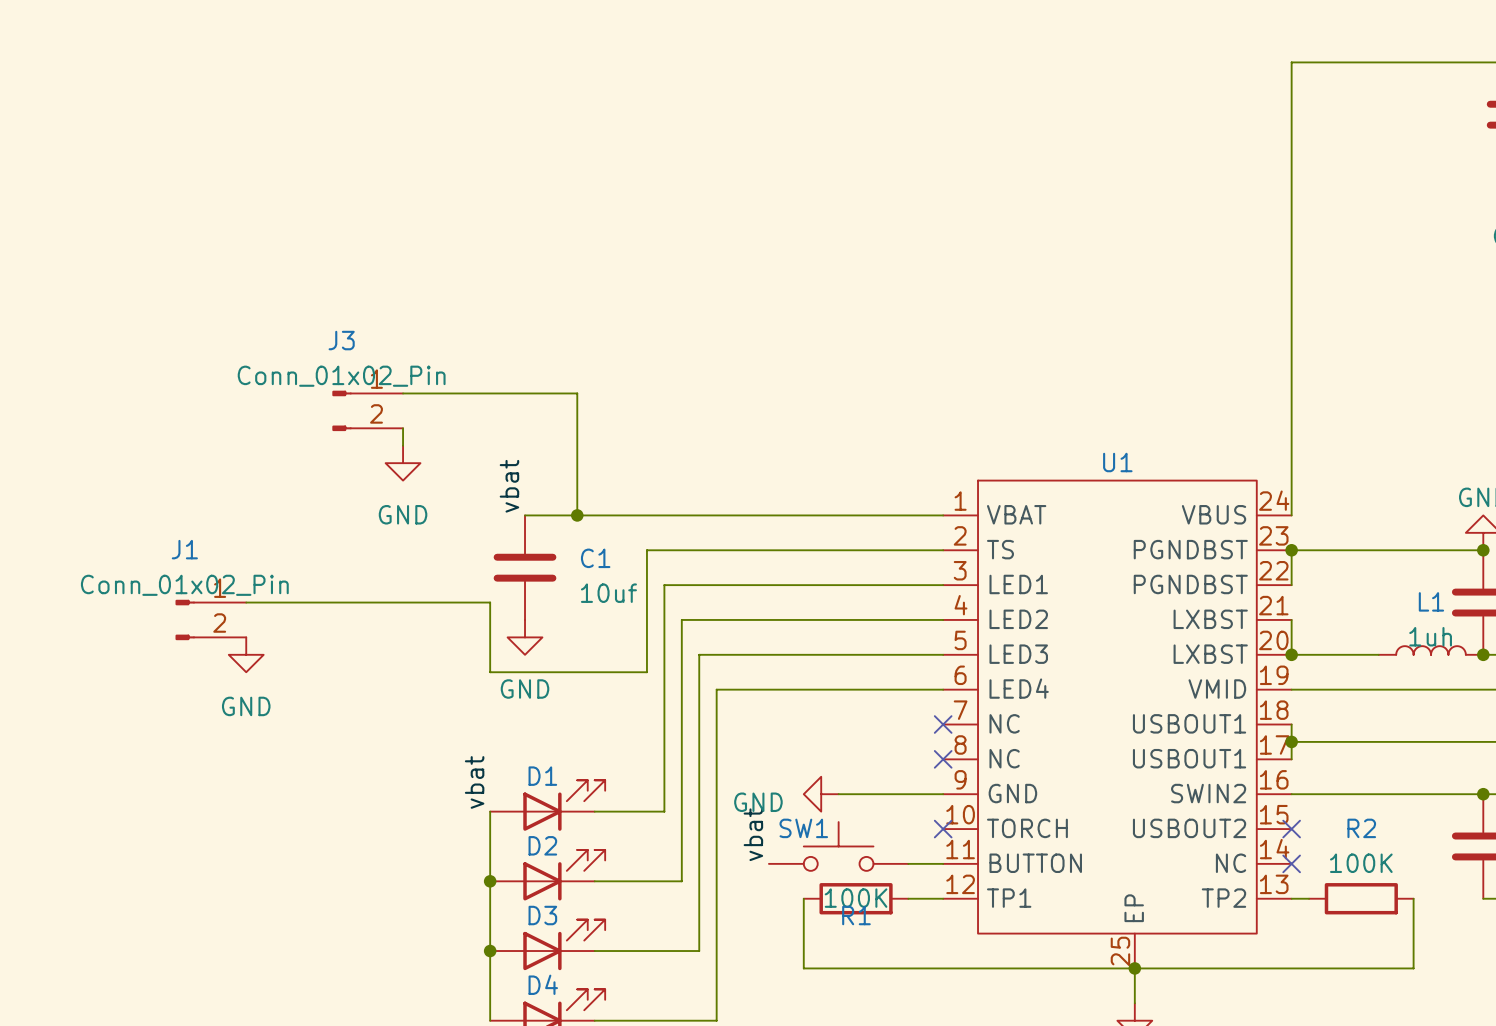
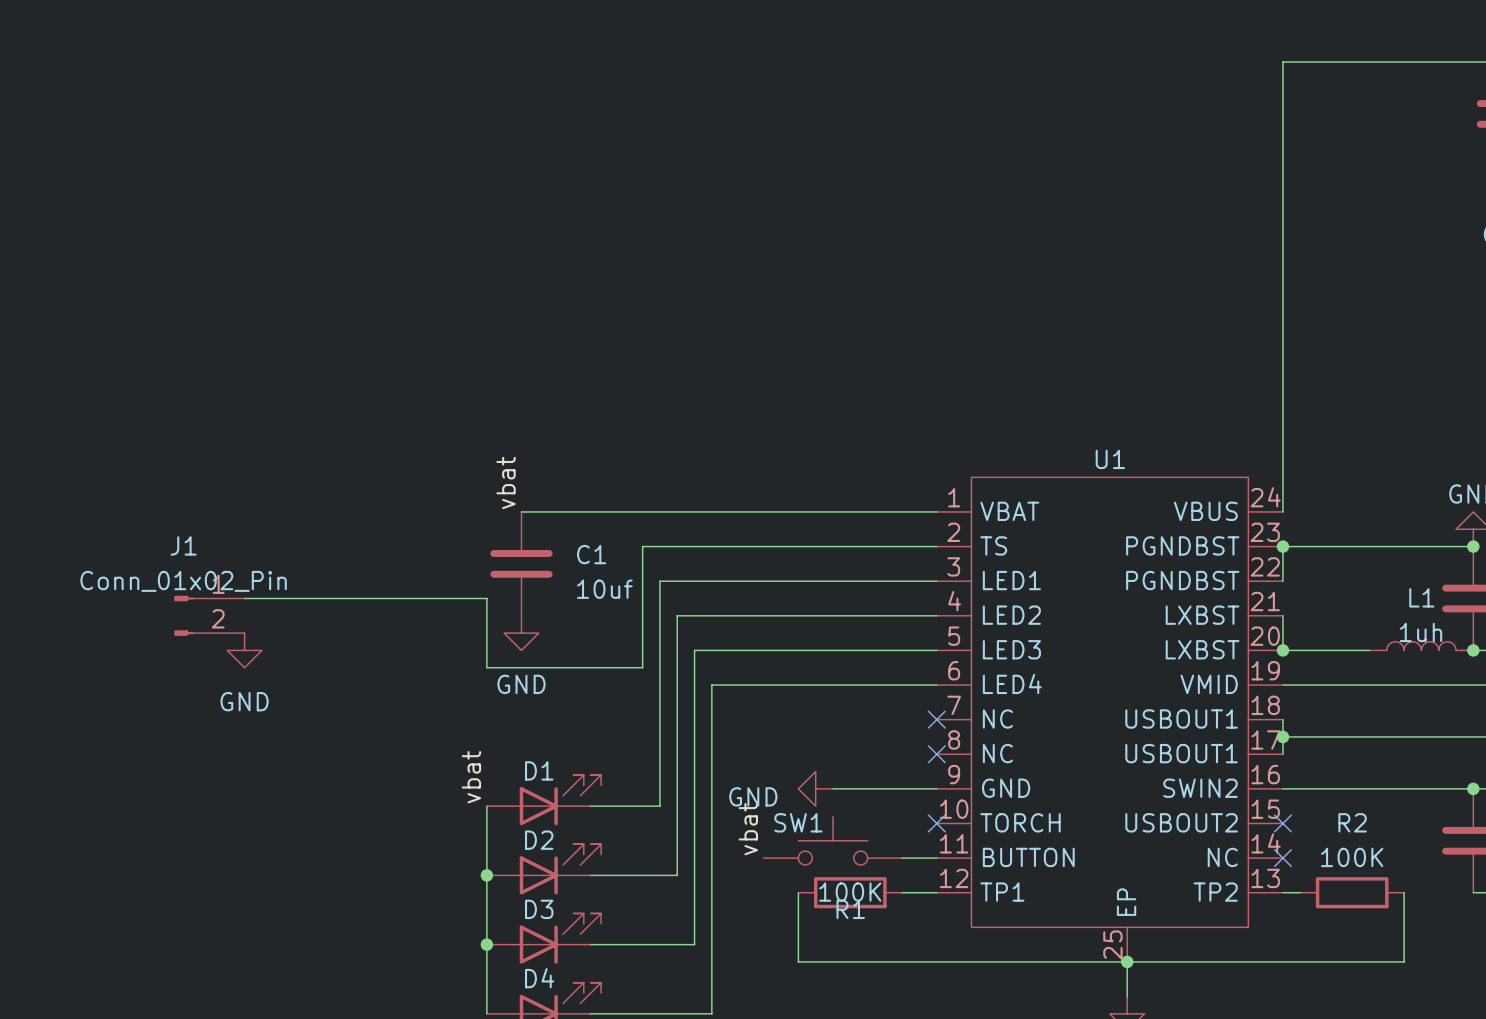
wire: (403, 393) (577, 393) (577, 515) -> none
J3: Conn_01x02_Pin (367, 410) -> none
wire: (403, 428) (403, 445) -> none
power symbol: GND (403, 463) -> none
junction: (577, 515) -> none

